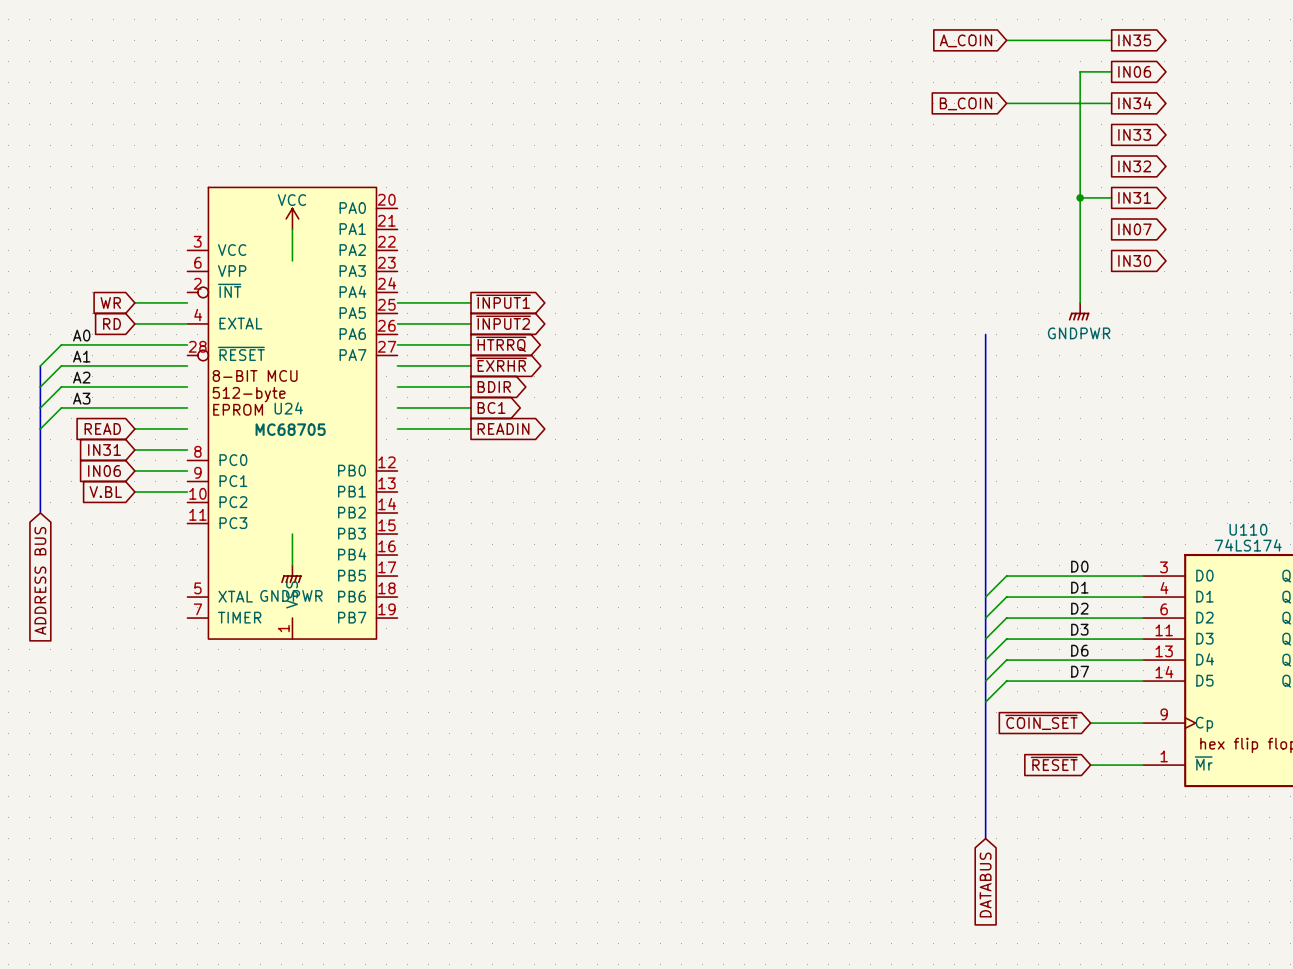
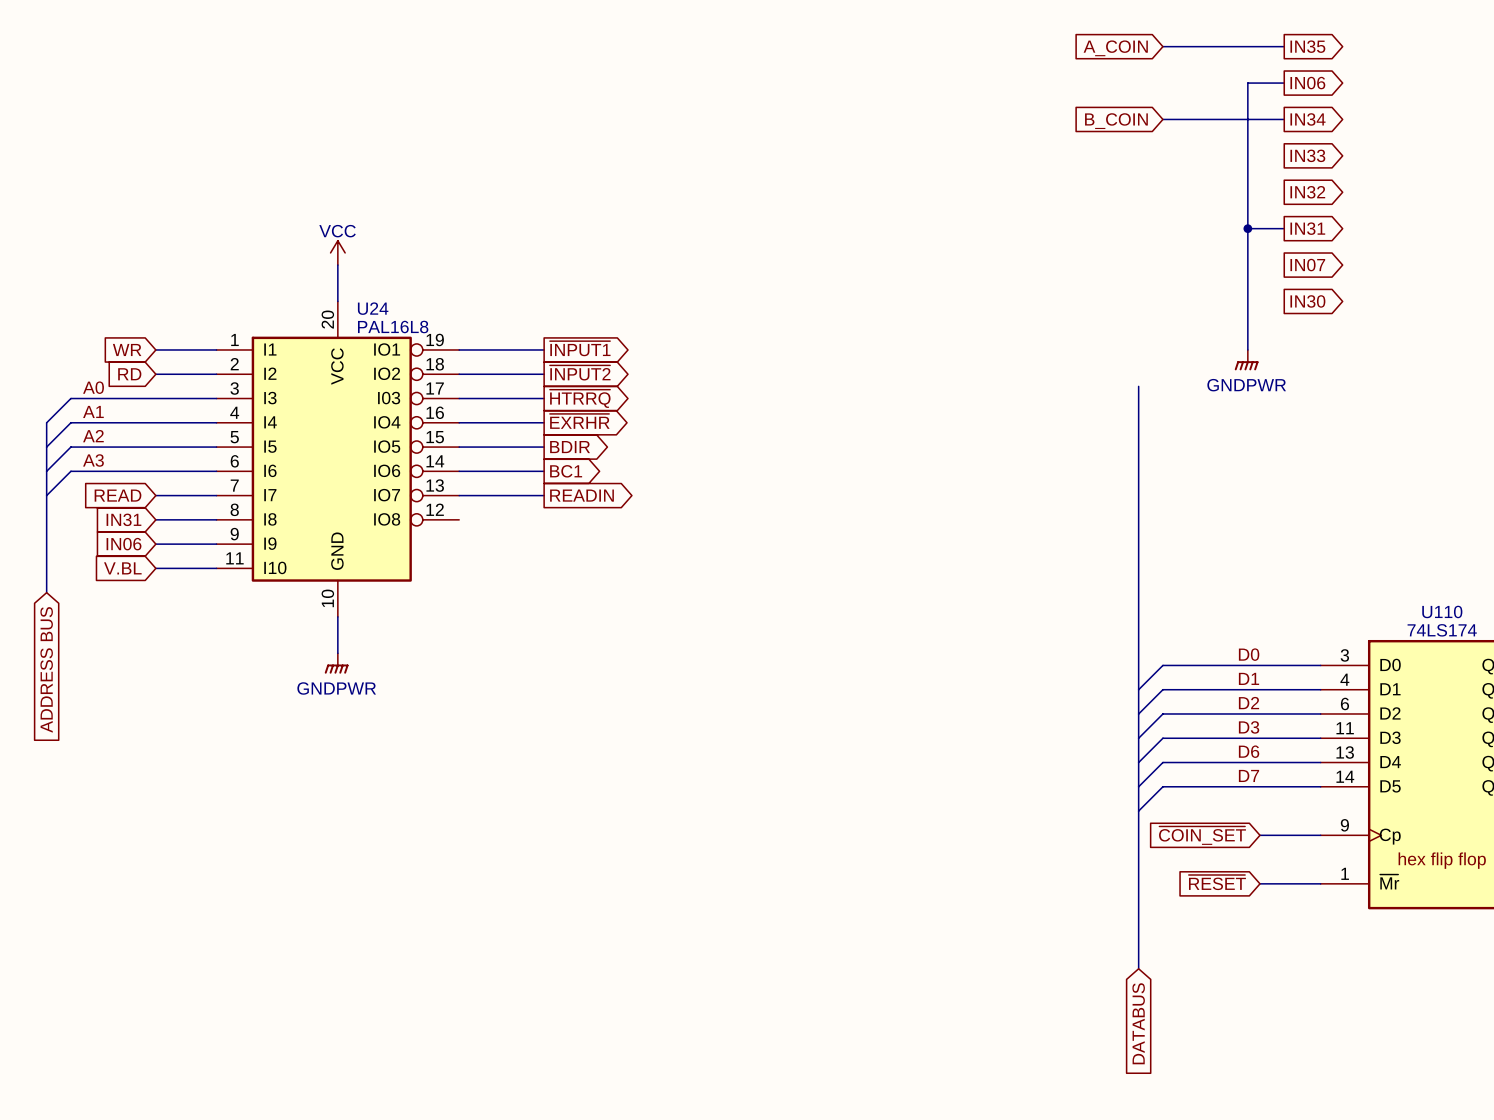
U24 symbol: [187, 187, 398, 640] -> [216, 301, 460, 617]
U24 name position: U24 (288, 408) -> U24 (373, 308)
U24 value: MC68705 (290, 429) -> PAL16L8 (393, 326)

